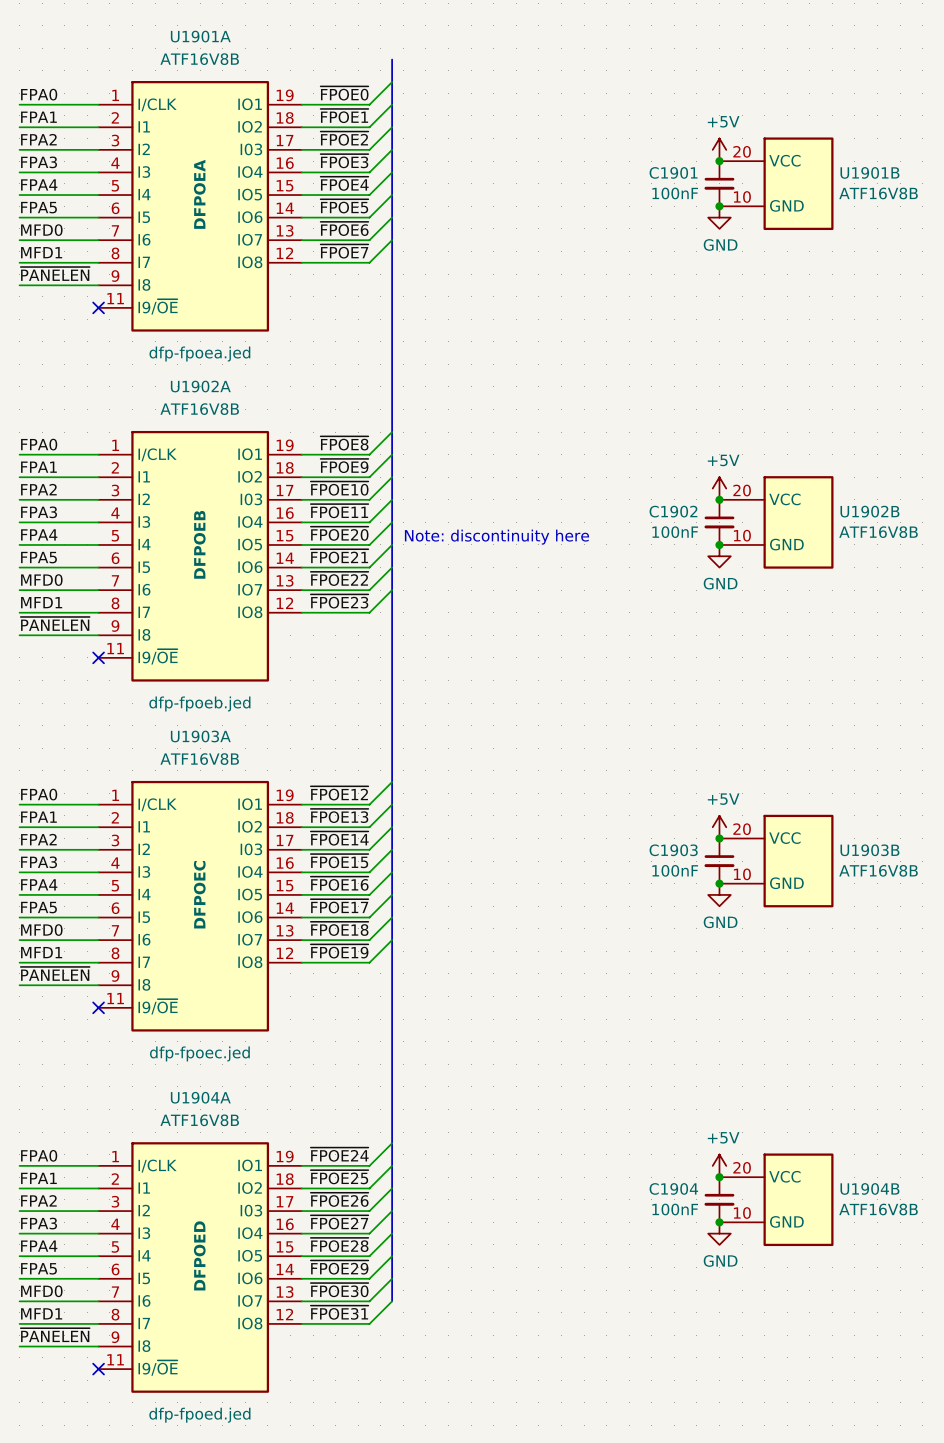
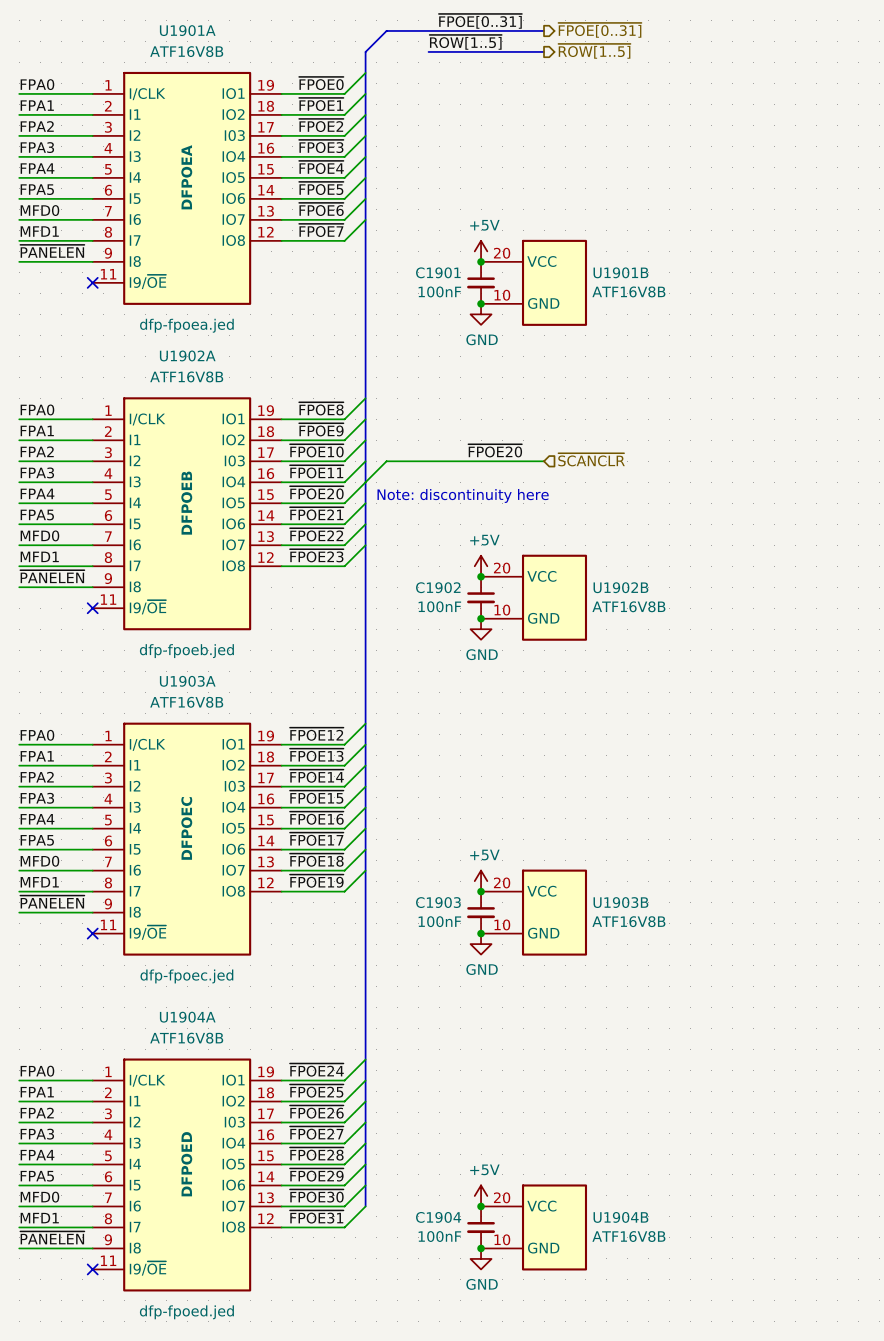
label: none -> ~{FPOE[0..31]} (480, 21)
bus: none -> (544, 30) (386, 30) (365, 51)
hierarchical label: none -> ~{FPOE[0..31]} (599, 30)
label: none -> ~{ROW[1..5]} (465, 42)
hierarchical label: none -> ~{ROW[1..5]} (594, 51)
bus: none -> (428, 51) (544, 51)
power symbol: +5V (719, 149) -> none
junction: (719, 161) -> none
C1901 position: (719, 183) -> (481, 282)
U1901B position: (776, 183) -> (534, 282)
junction: (719, 206) -> none
power symbol: GND (719, 217) -> none
power symbol: none -> +5V (481, 251)
junction: none -> (481, 261)
junction: none -> (481, 303)
power symbol: none -> GND (481, 314)
label: none -> ~{FPOE20} (495, 450)
power symbol: +5V (719, 488) -> none
hierarchical label: none -> ~{SCANCLR} (591, 459)
wire: none -> (544, 461) (386, 461) (365, 482)
junction: (719, 499) -> none
C1902 position: (719, 522) -> (481, 597)
U1902B position: (776, 522) -> (534, 597)
junction: (719, 544) -> none
power symbol: GND (719, 556) -> none
power symbol: none -> +5V (481, 566)
junction: none -> (481, 576)
junction: none -> (481, 618)
power symbol: none -> GND (481, 629)
power symbol: +5V (719, 827) -> none
junction: (719, 838) -> none
C1903 position: (719, 861) -> (481, 912)
U1903B position: (776, 861) -> (534, 912)
junction: (719, 883) -> none
power symbol: GND (719, 894) -> none
power symbol: none -> +5V (481, 881)
junction: none -> (481, 891)
junction: none -> (481, 933)
power symbol: none -> GND (481, 944)
power symbol: +5V (719, 1165) -> none
junction: (719, 1177) -> none
C1904 position: (719, 1199) -> (481, 1227)
U1904B position: (776, 1199) -> (534, 1227)
junction: (719, 1222) -> none
power symbol: GND (719, 1233) -> none
power symbol: none -> +5V (481, 1195)
junction: none -> (481, 1206)
junction: none -> (481, 1248)
power symbol: none -> GND (481, 1258)

